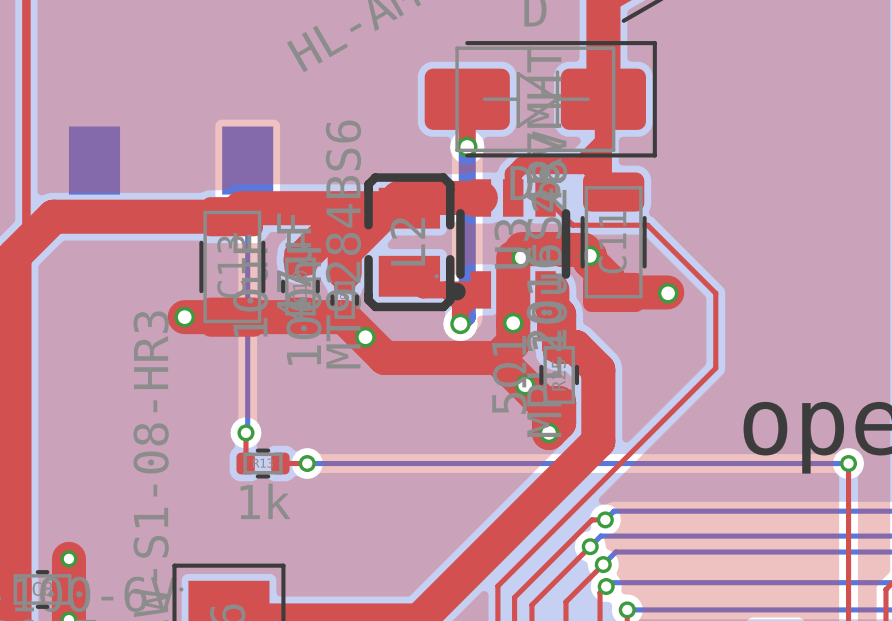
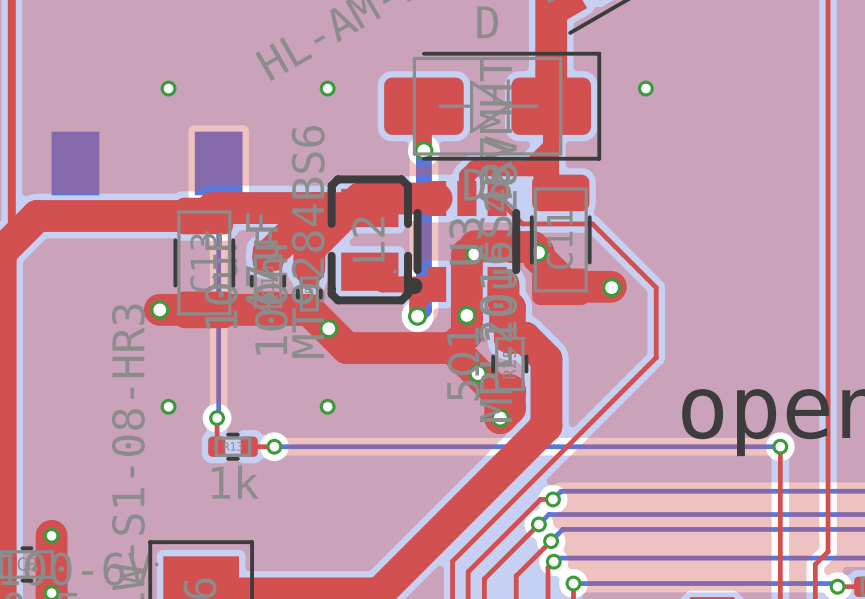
via: none -> (168, 88)
via: none -> (327, 88)
via: none -> (645, 88)
via: none -> (168, 406)
via: none -> (327, 406)

